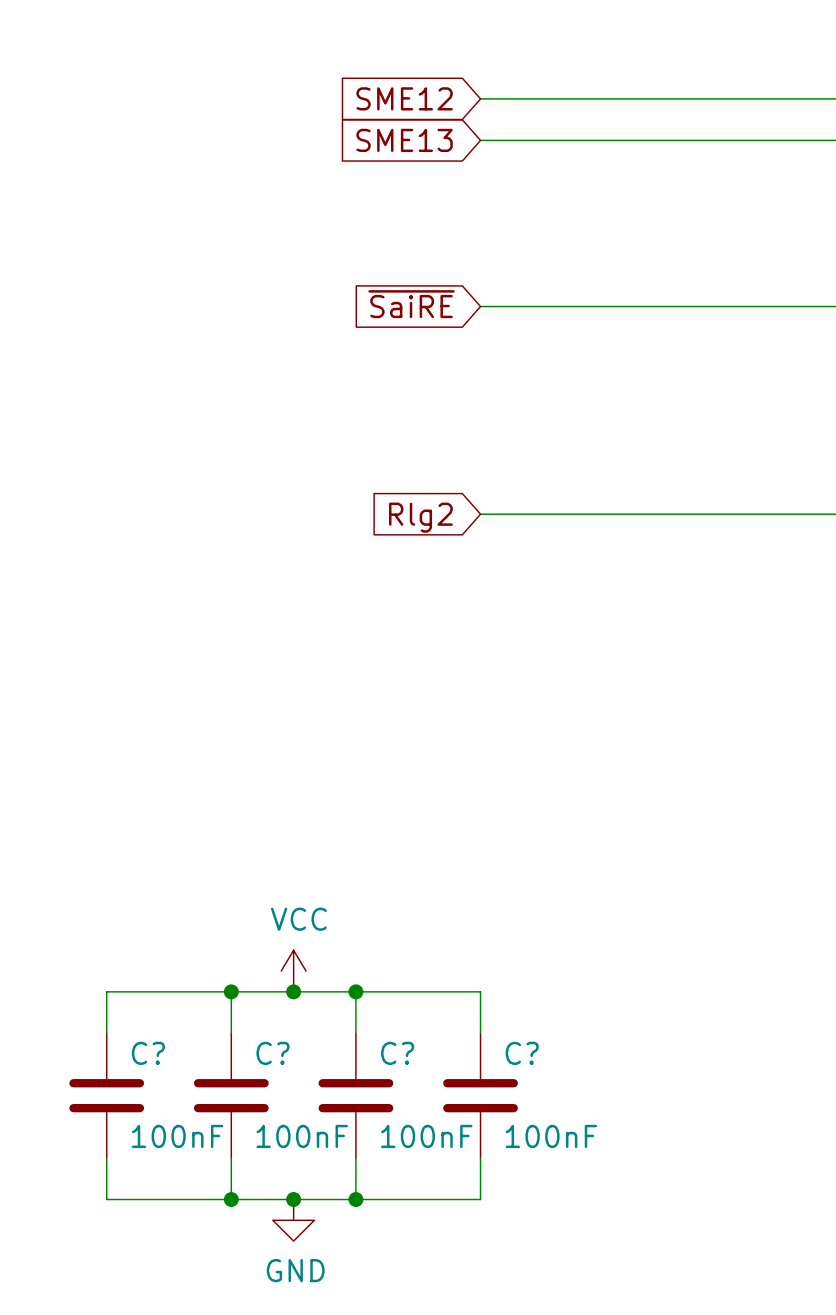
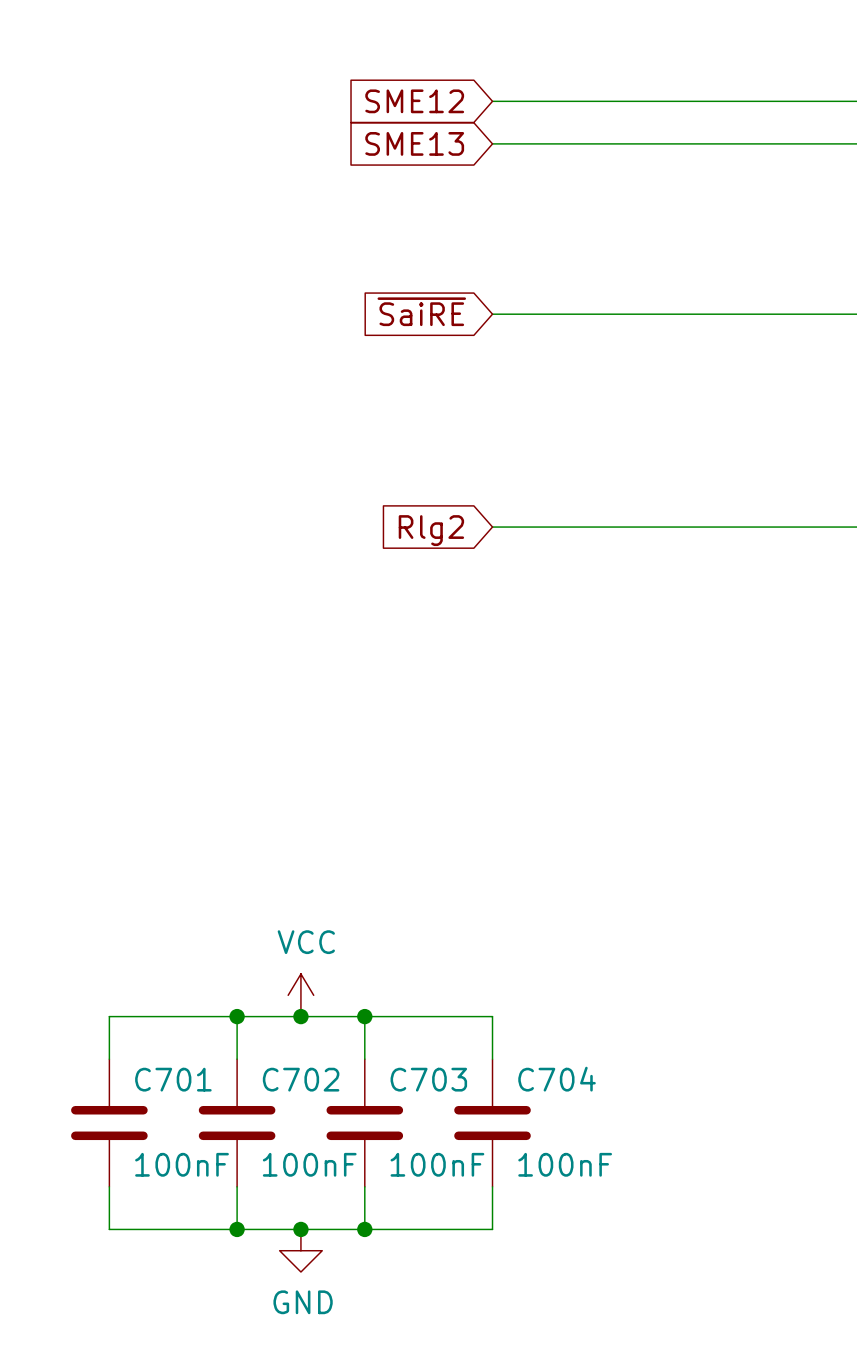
C? name: C? (148, 1053) -> C701 (173, 1079)
C? name: C? (273, 1053) -> C702 (301, 1079)
C? name: C? (397, 1053) -> C703 (428, 1079)
C? name: C? (522, 1053) -> C704 (557, 1079)

